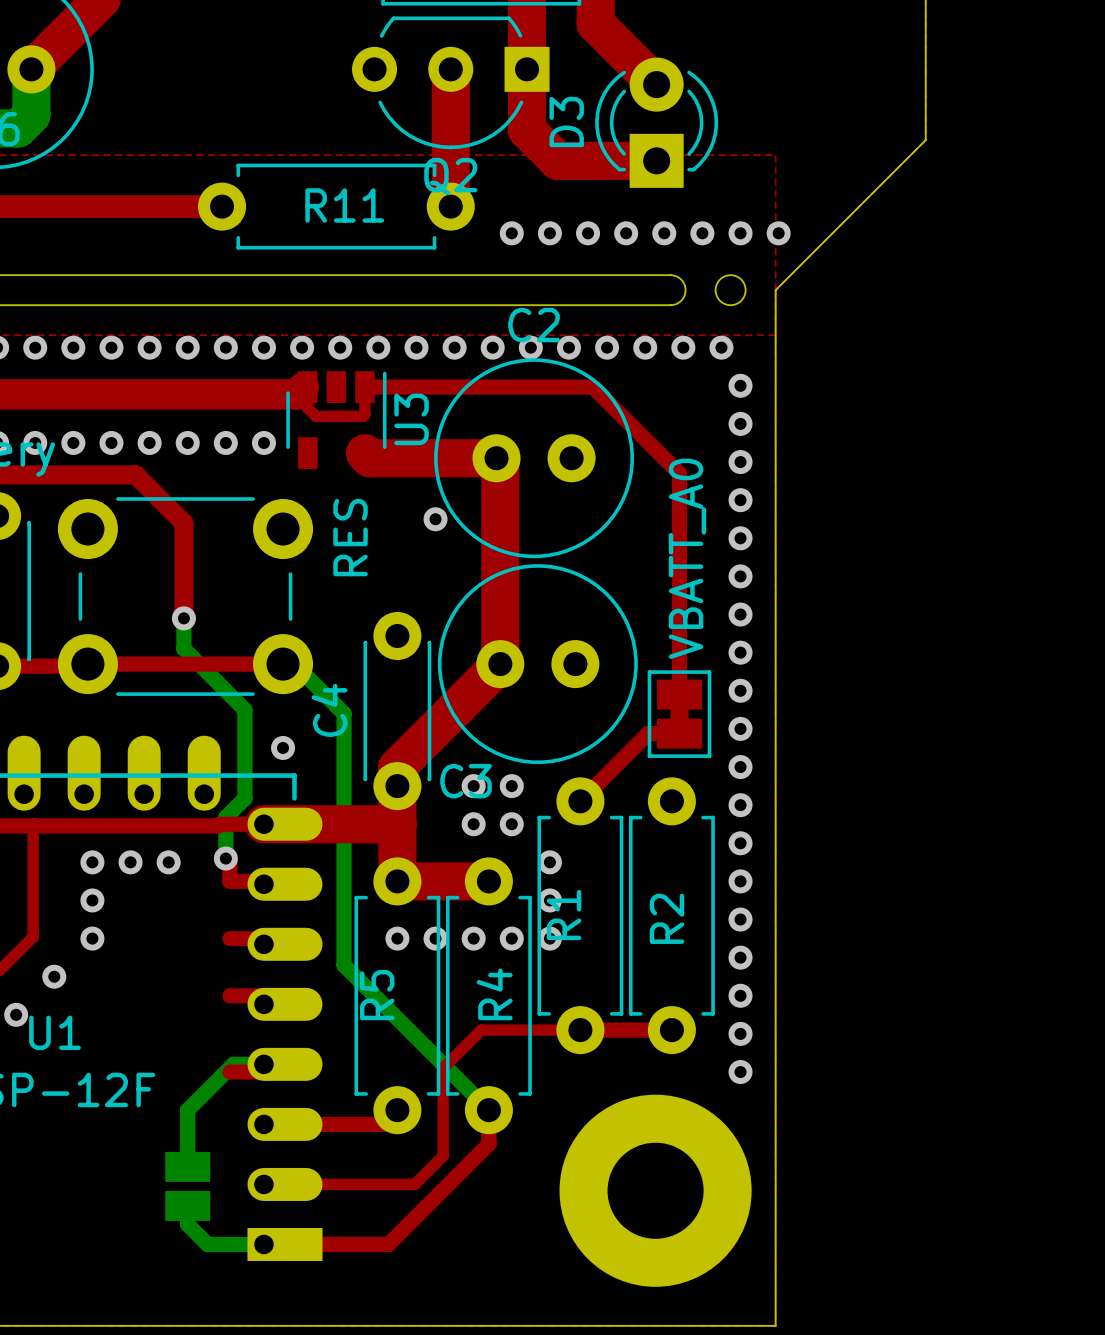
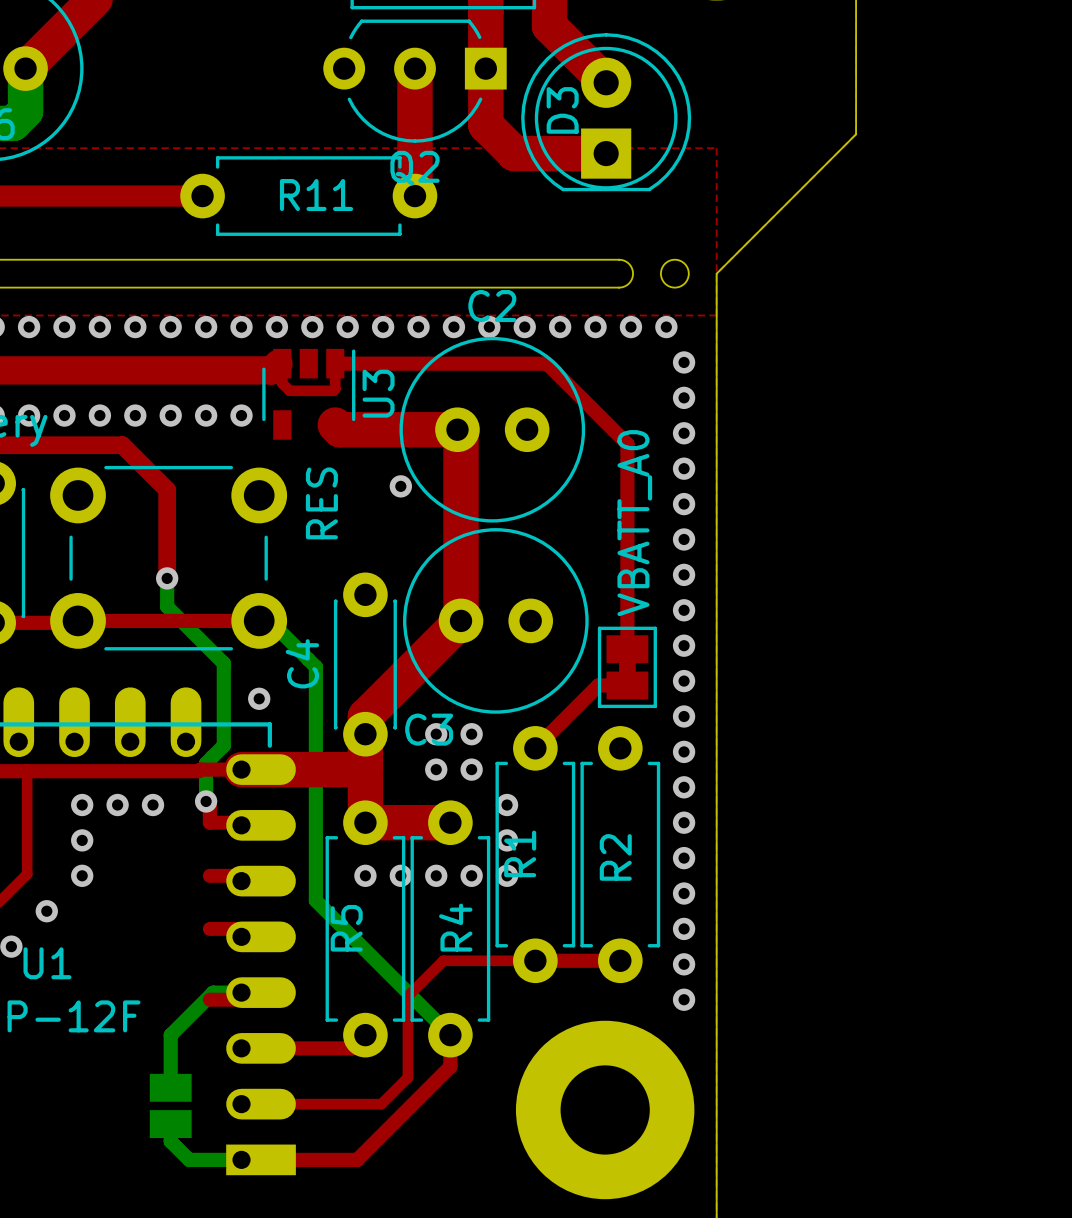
D3 footprint: [595, 57, 719, 188] -> [521, 33, 692, 192]
via: (511, 233) -> none
via: (549, 233) -> none
via: (588, 233) -> none
via: (626, 233) -> none
via: (664, 233) -> none
via: (702, 233) -> none
via: (740, 233) -> none
via: (778, 233) -> none

